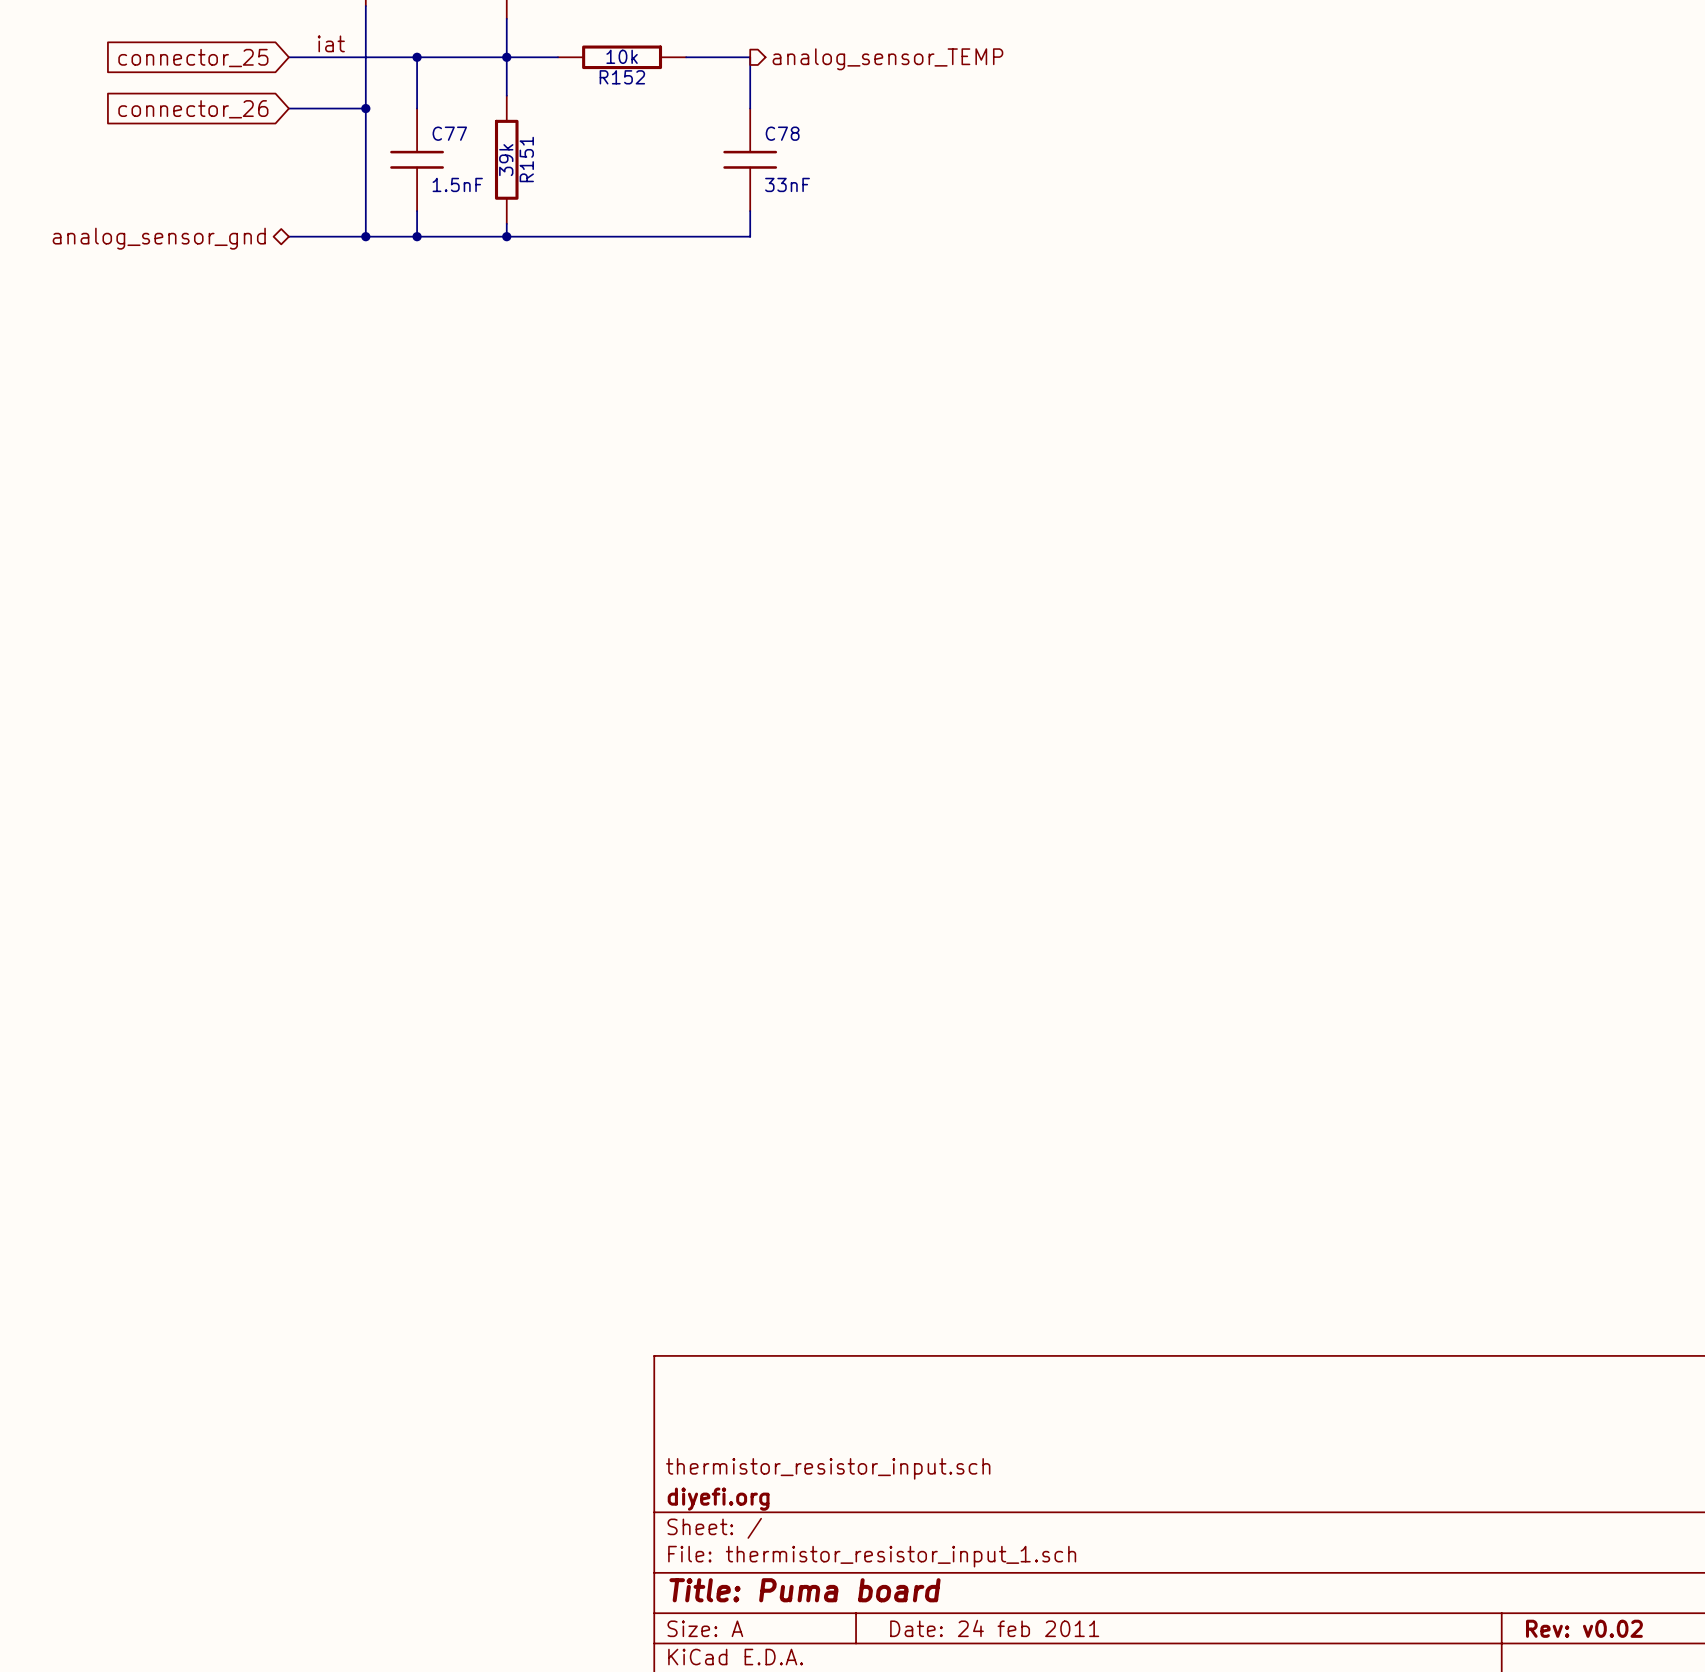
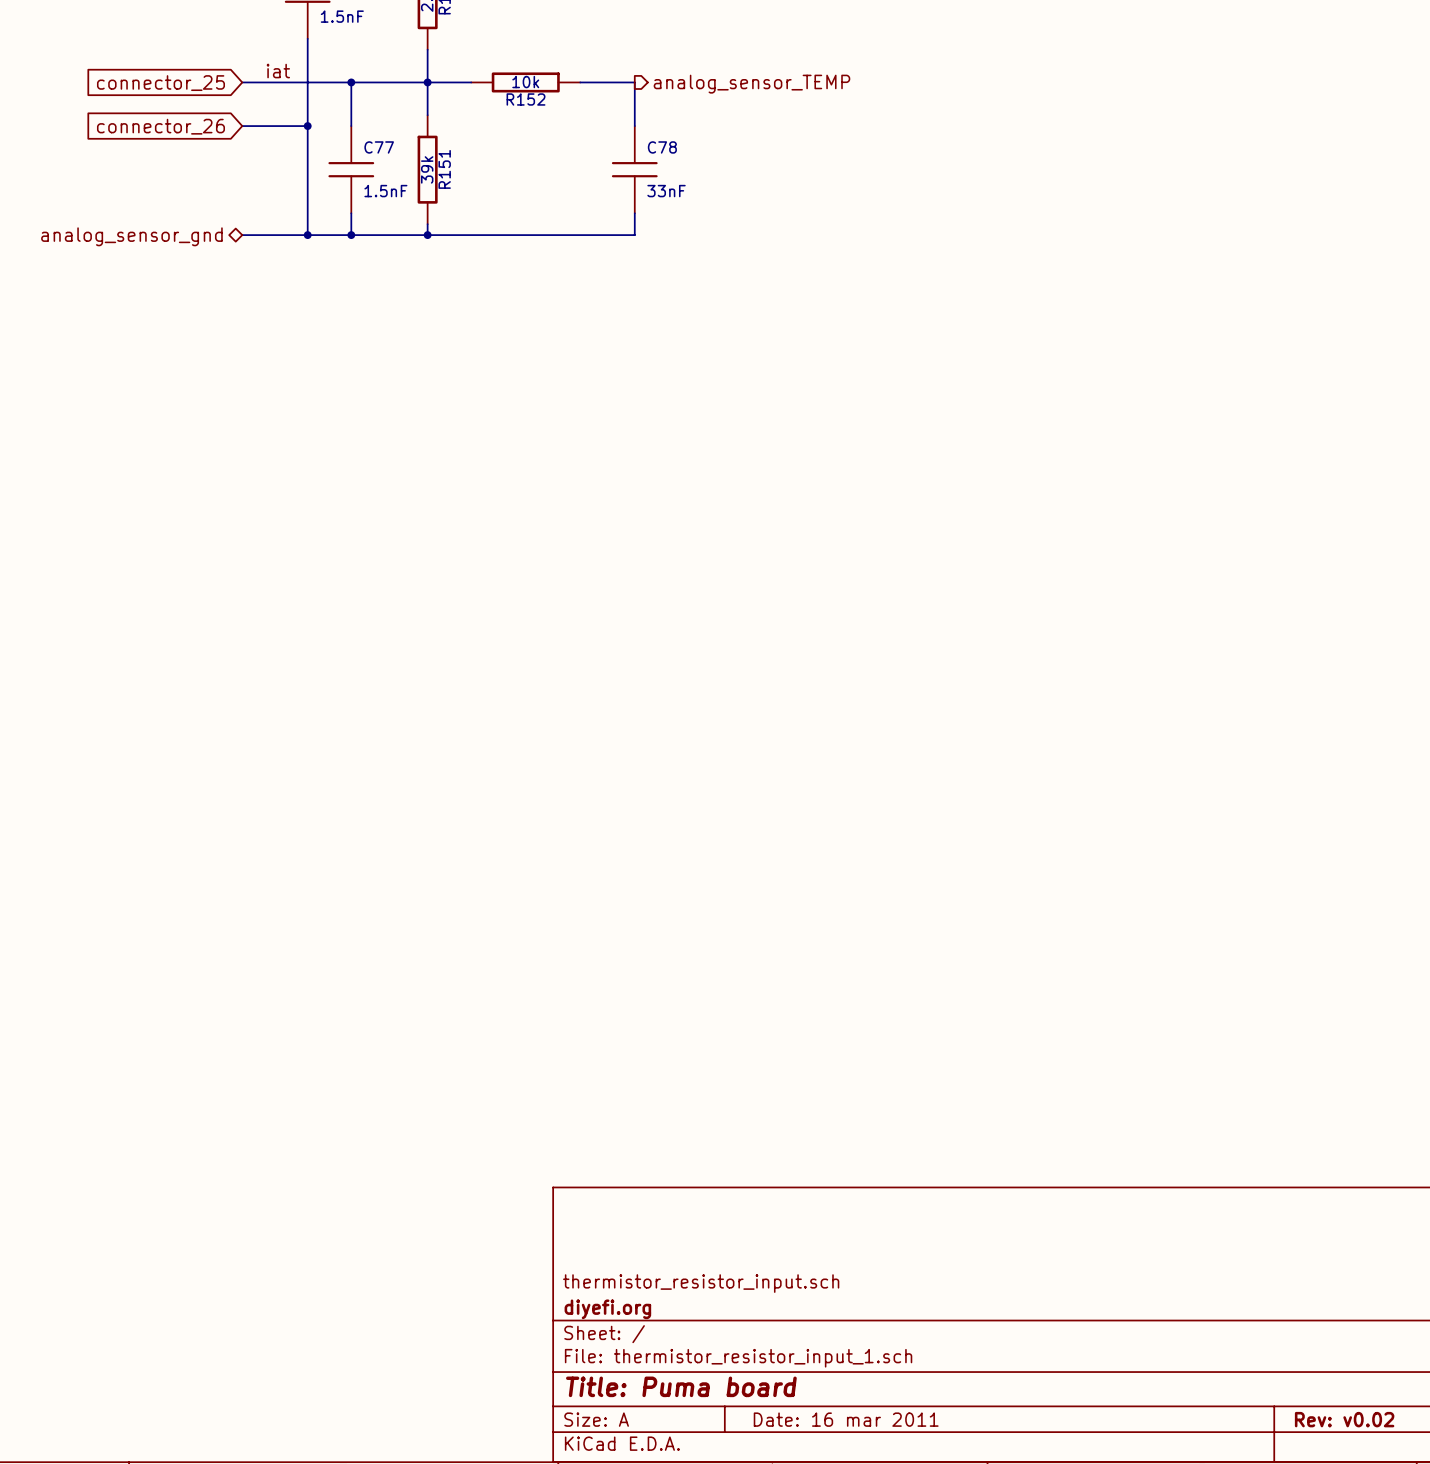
title block: Date: 24 feb 2011 (994, 1628) -> Date: 16 mar 2011 (846, 1419)

